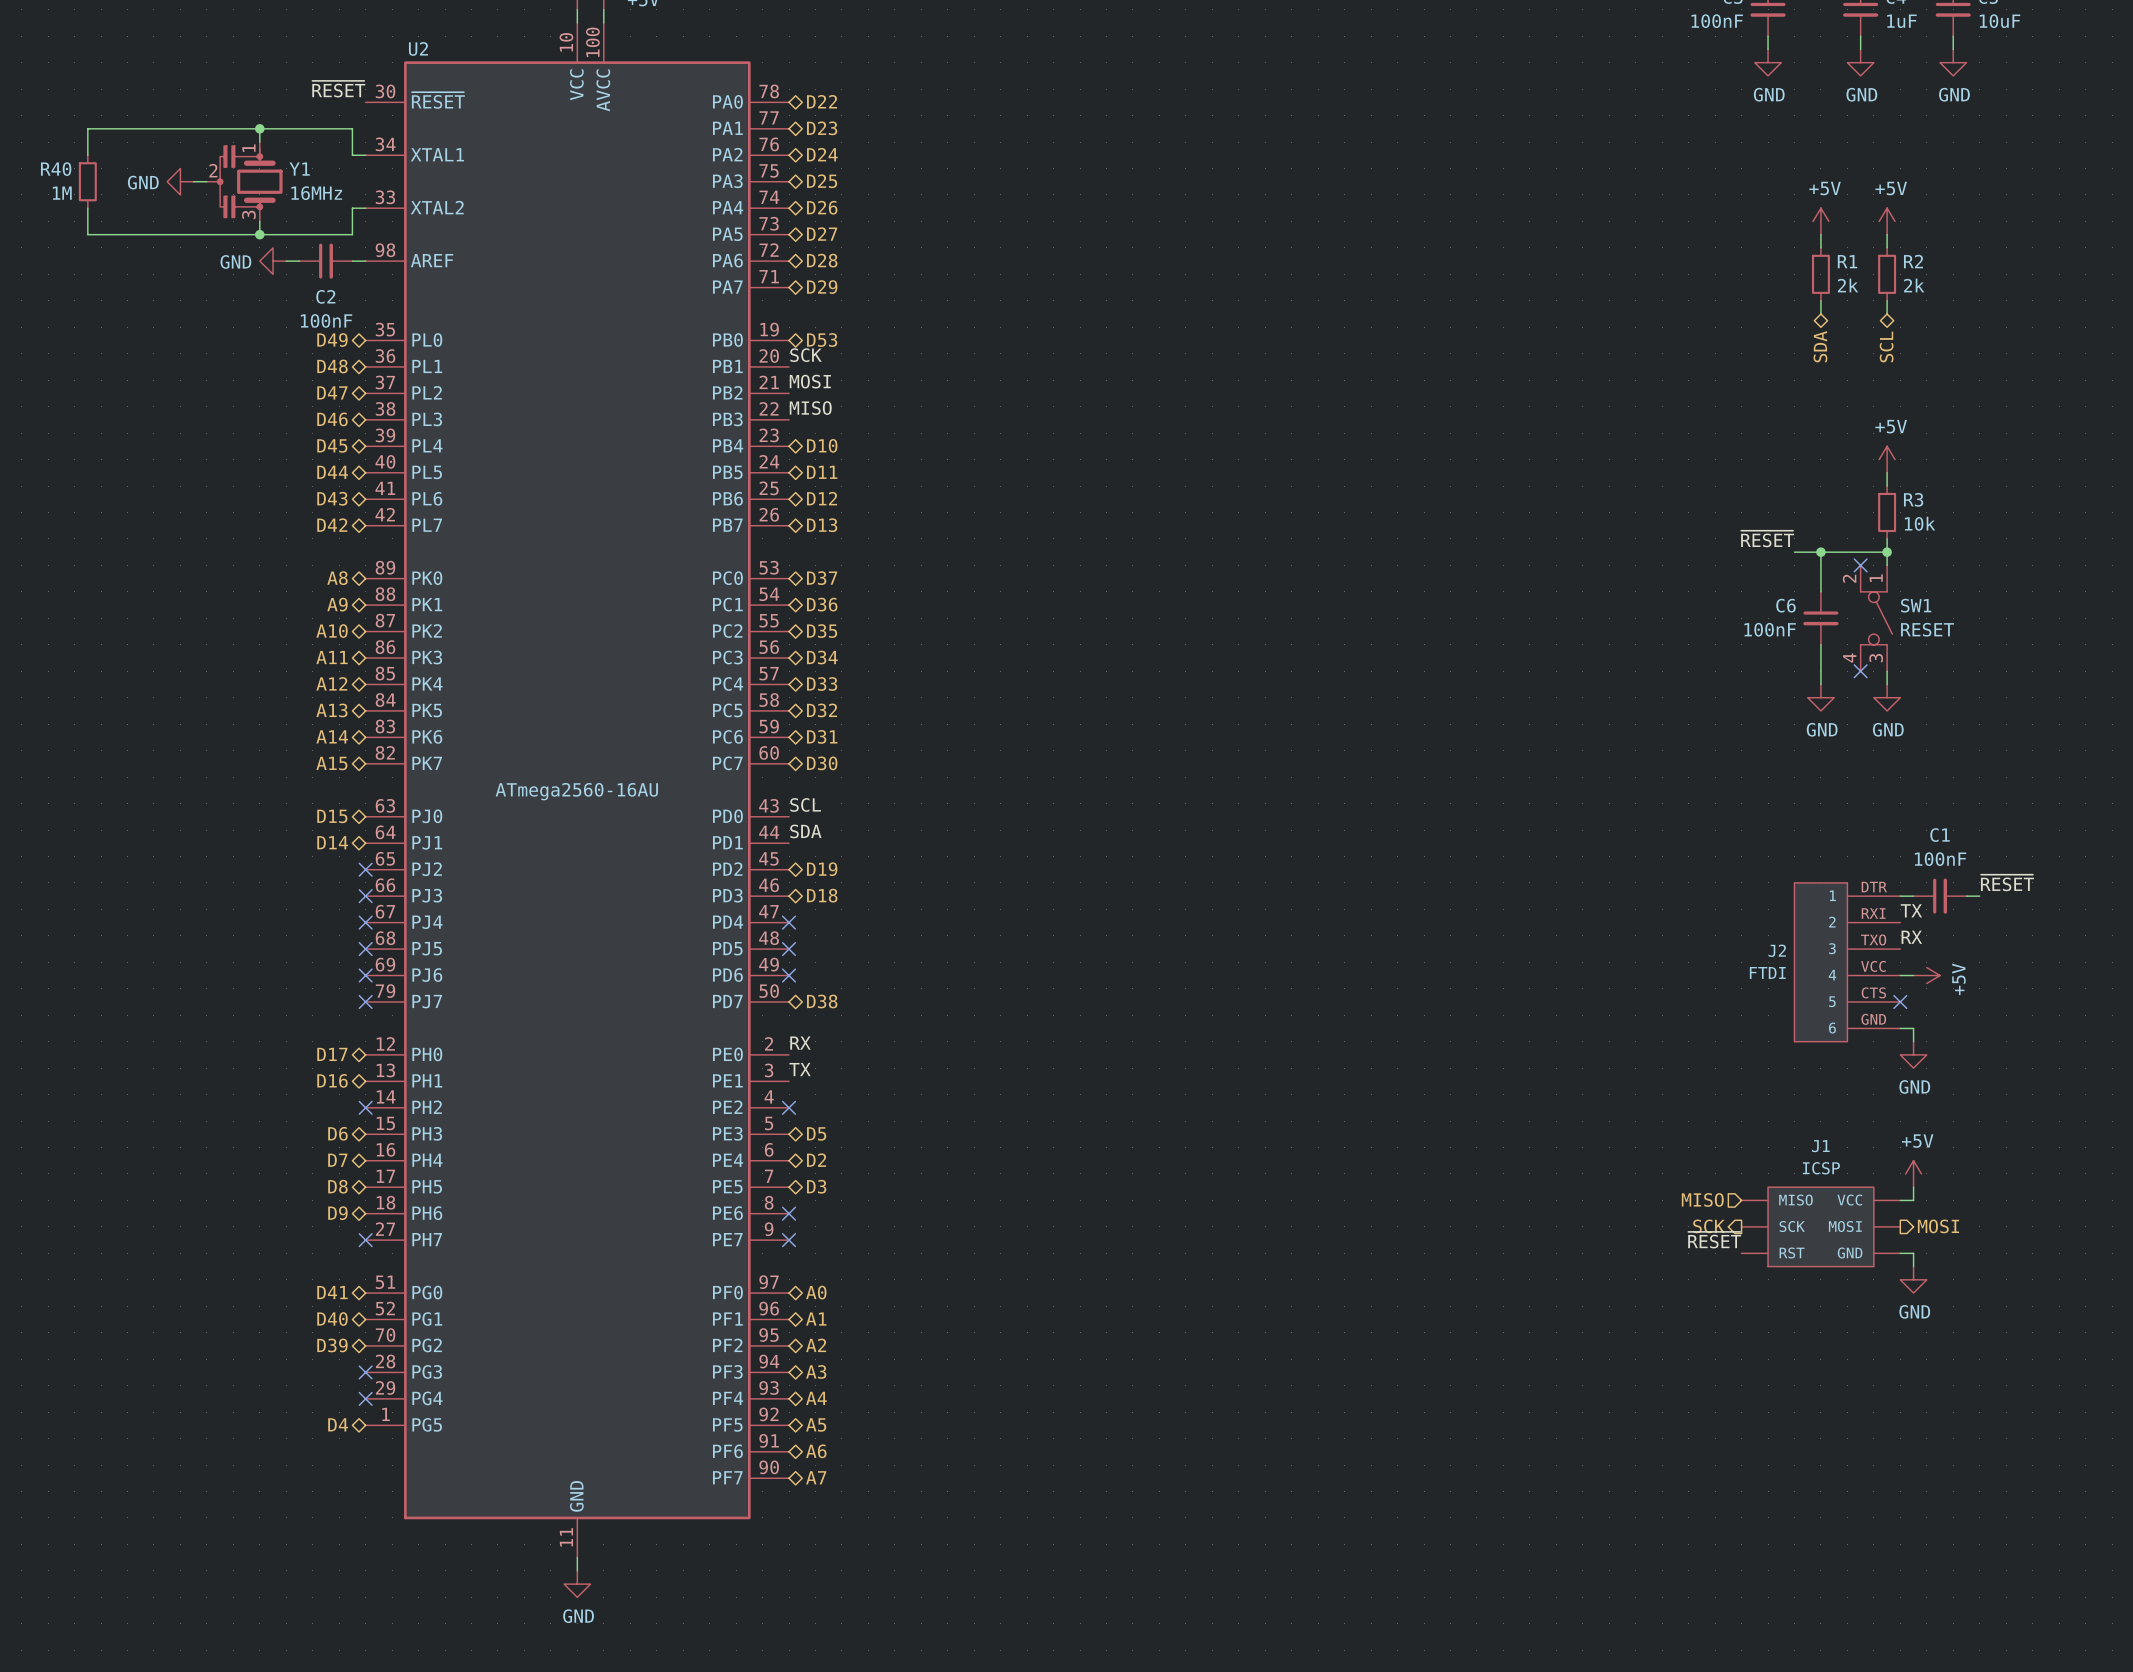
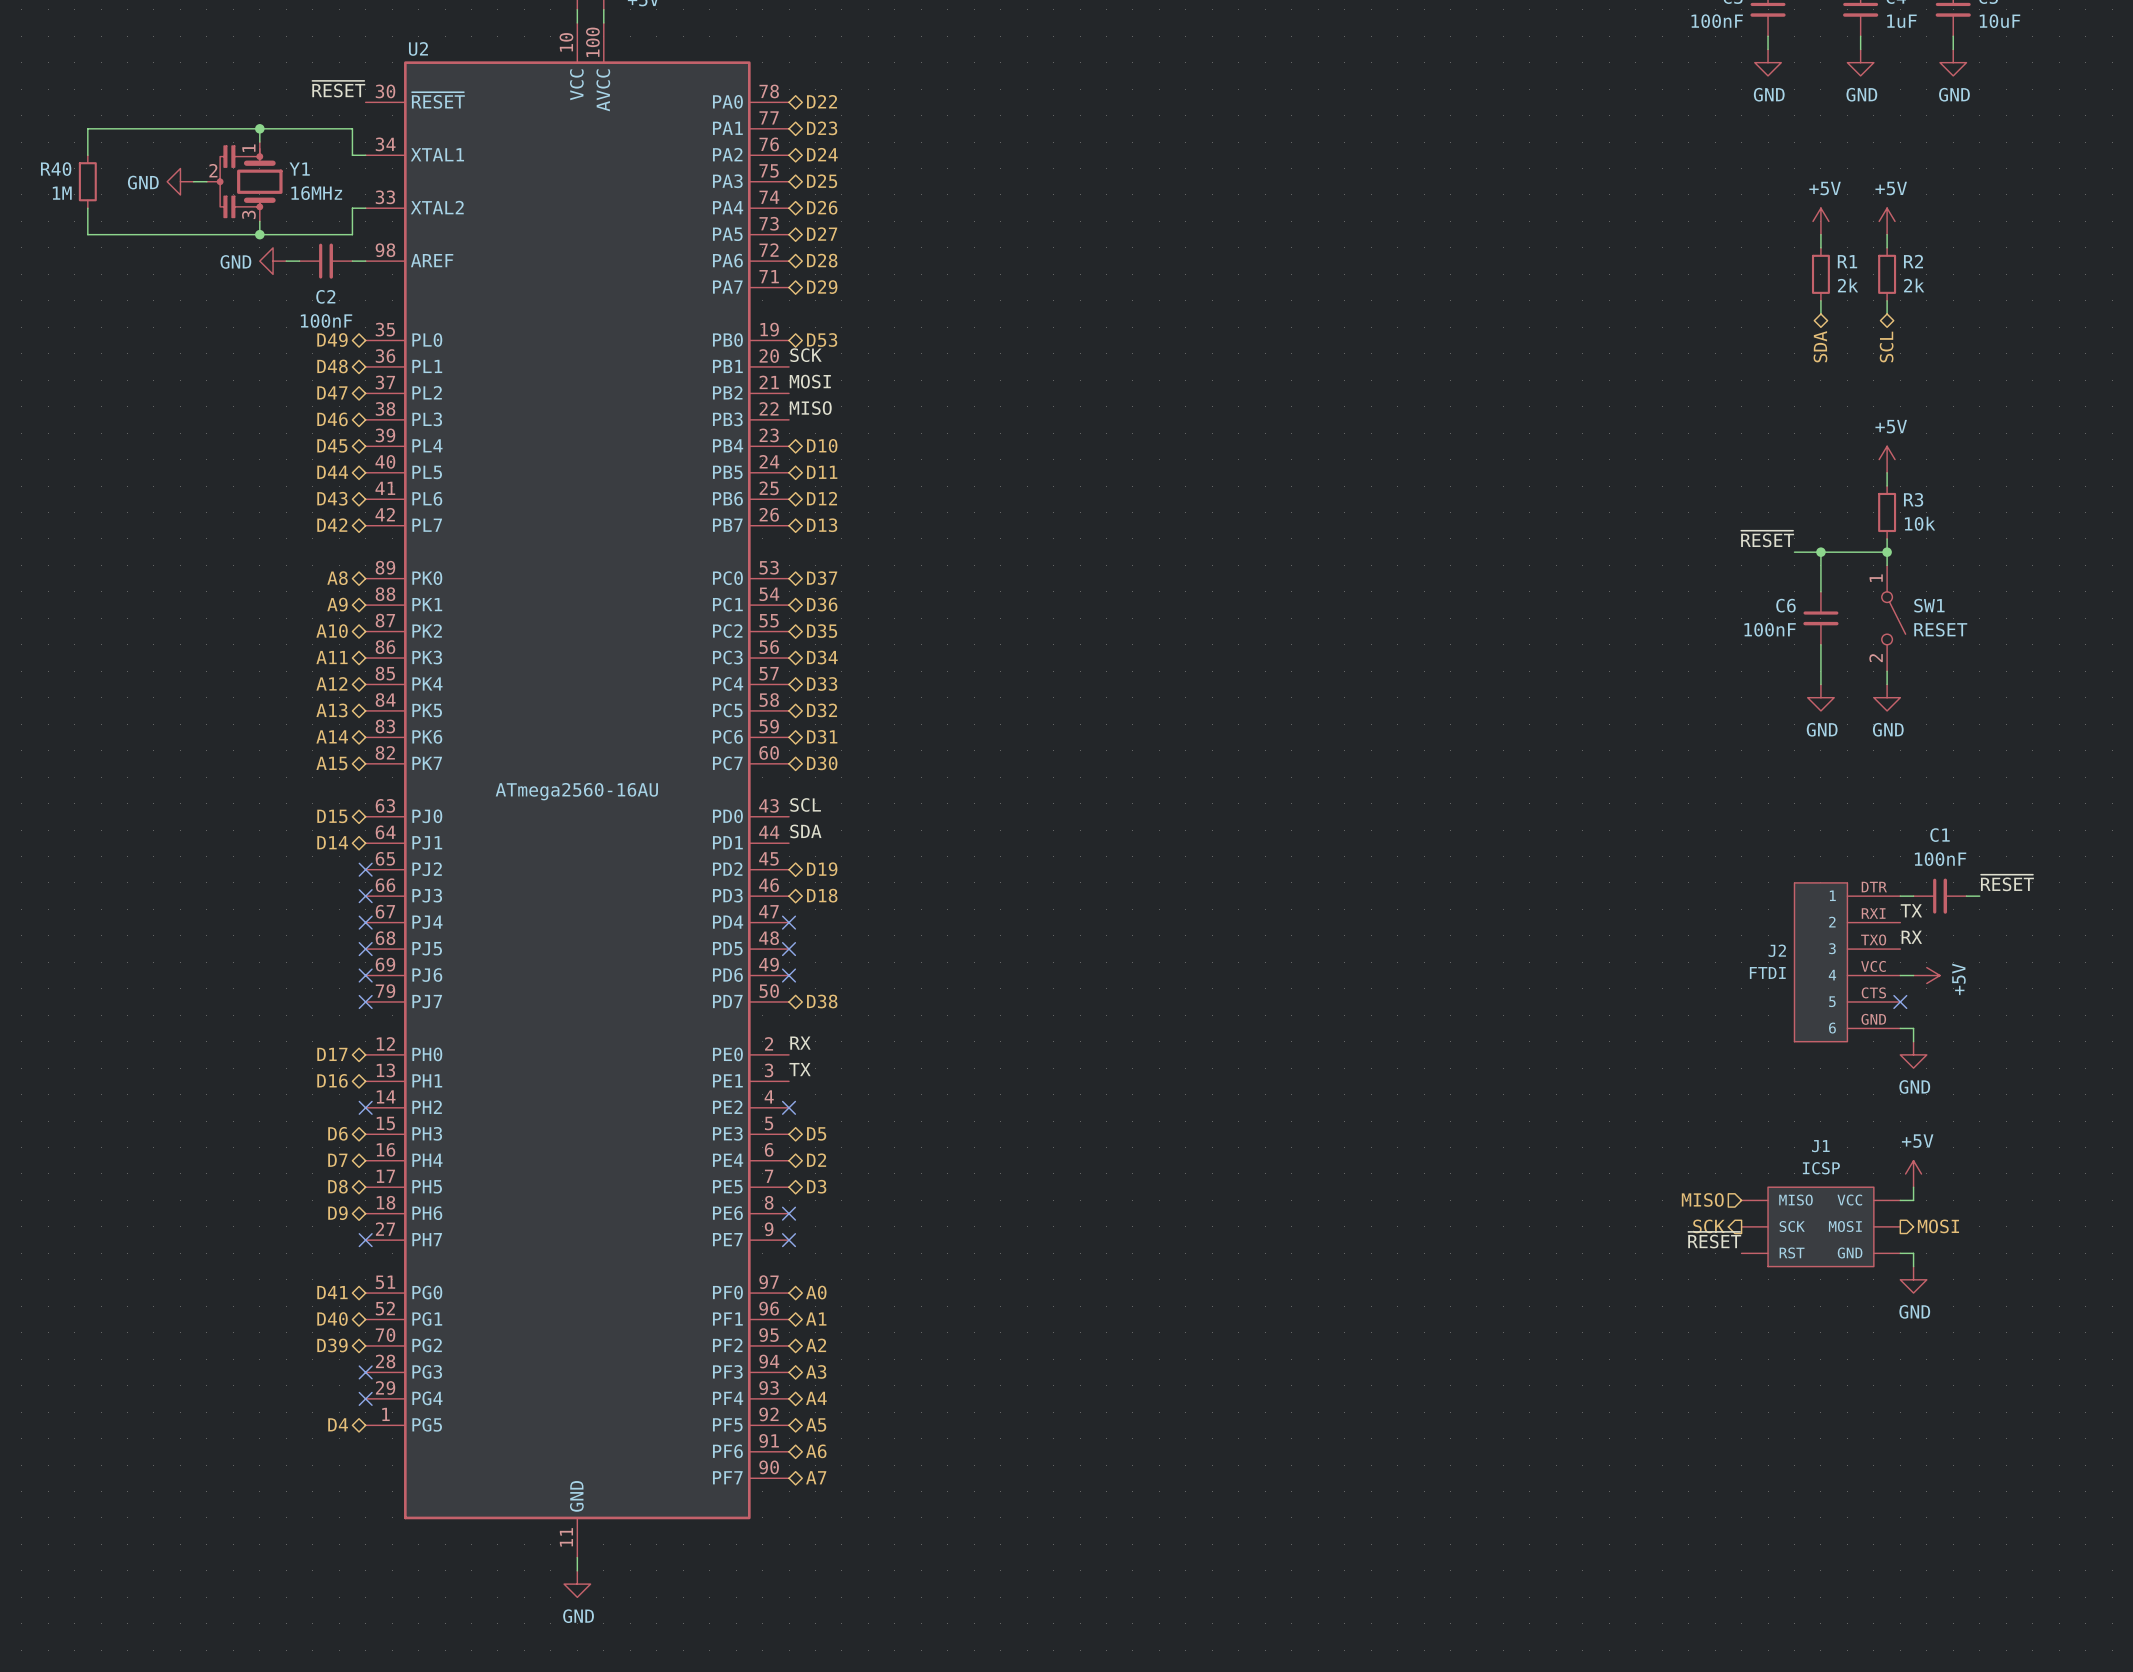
SW1 symbol: [1860, 565, 1893, 672] -> [1881, 565, 1906, 672]
no-connect mark: (1860, 565) -> none
no-connect mark: (1860, 671) -> none

